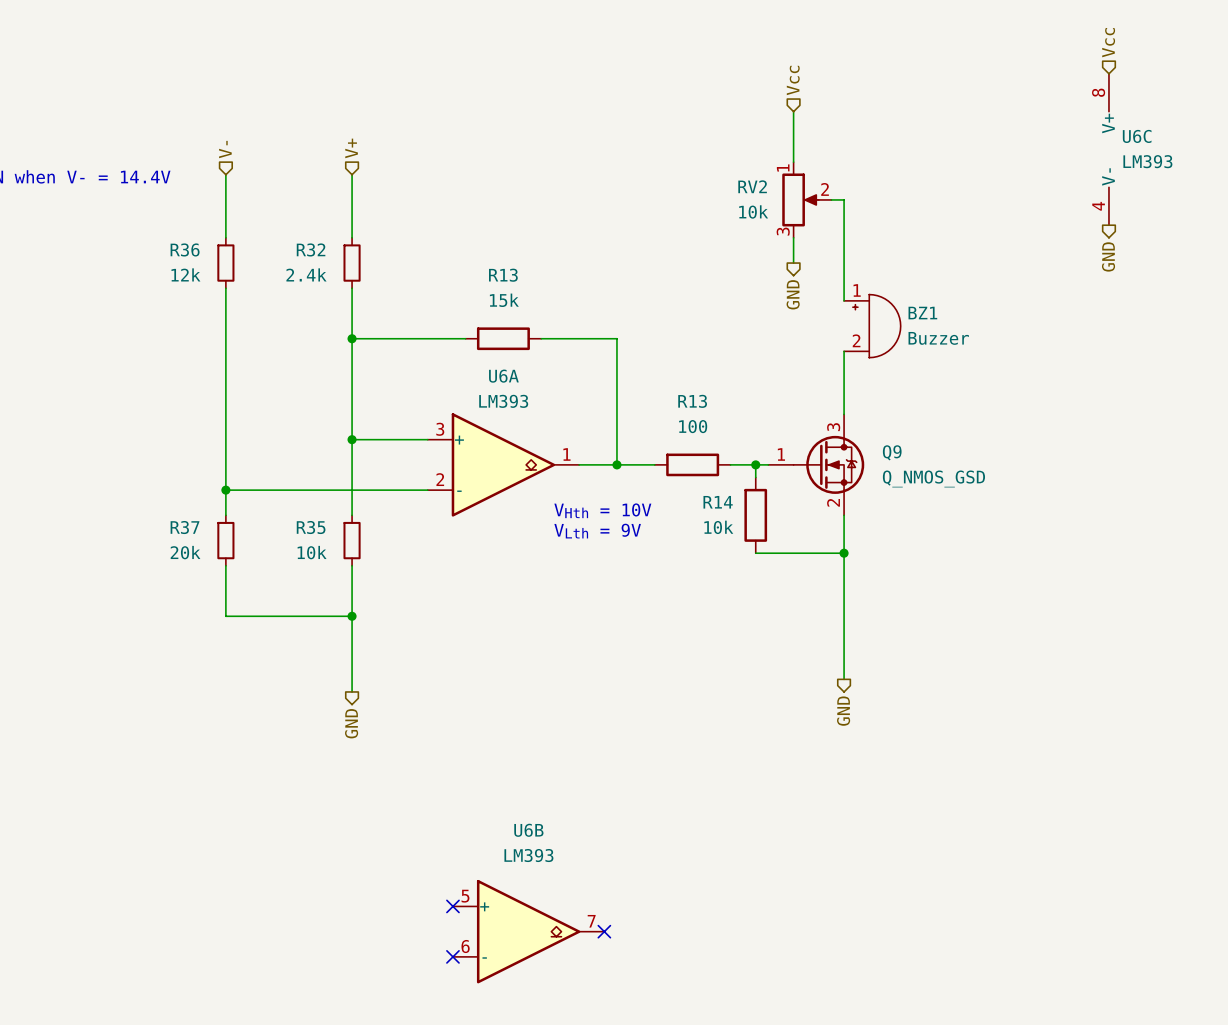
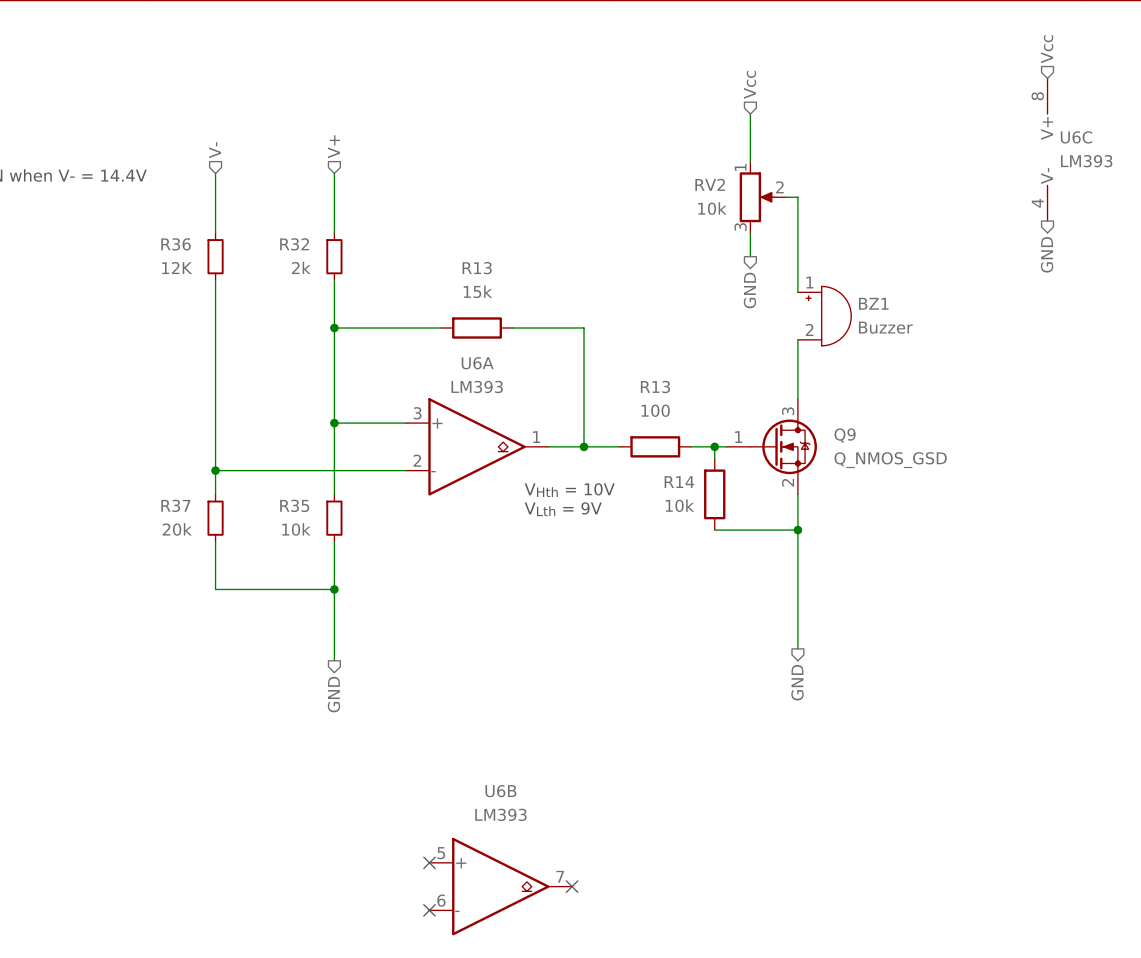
R36 value: 12k (185, 274) -> 12K (177, 268)
R32 value: 2.4k (306, 274) -> 2k (301, 267)

